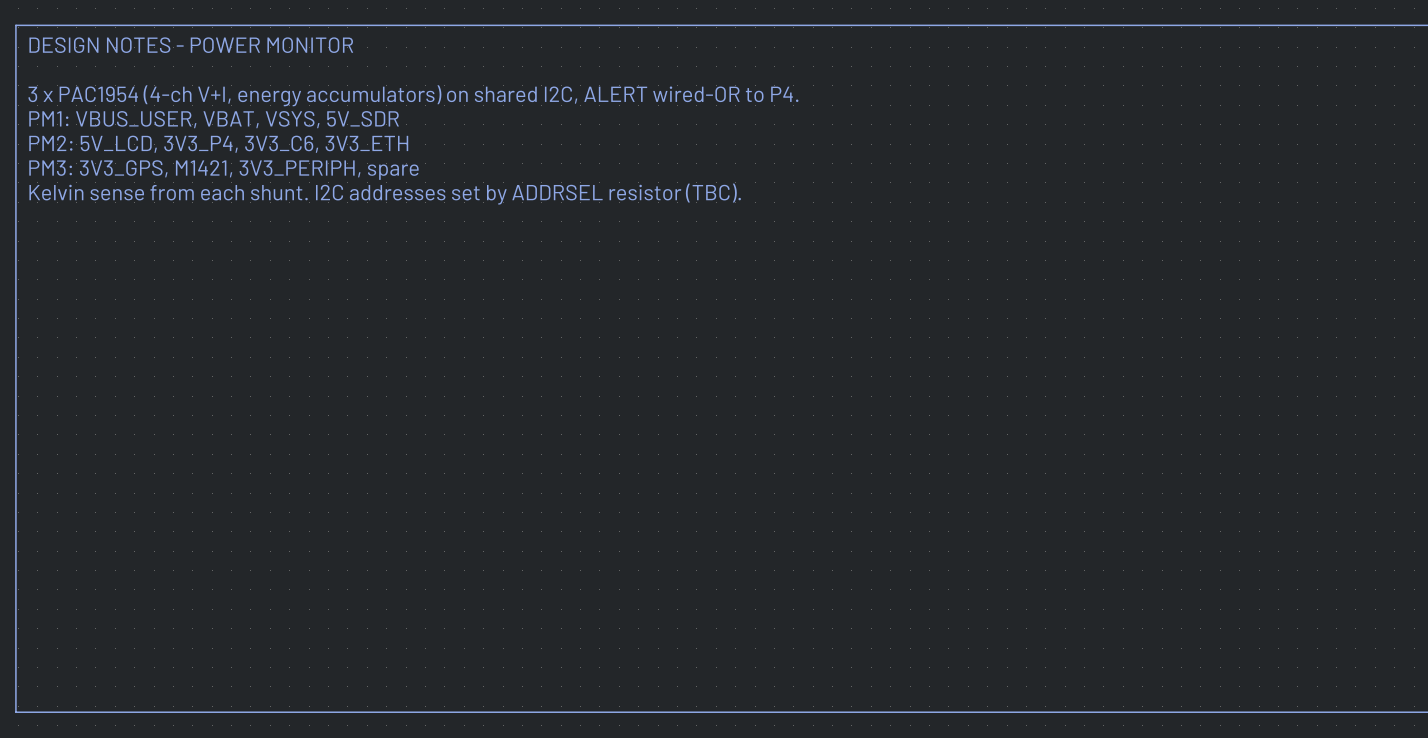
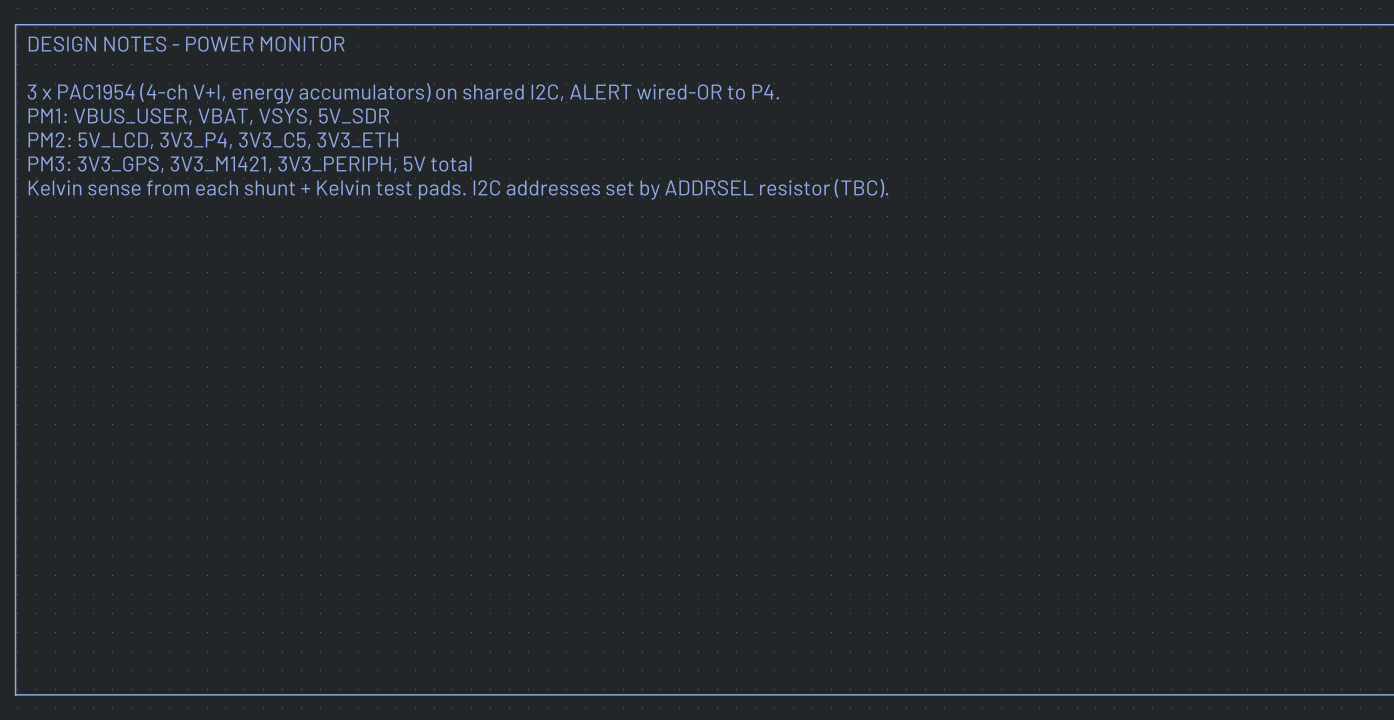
text: PM2: 5V_LCD, 3V3_P4, 3V3_C6, 3V3_ETH (218, 144) -> PM2: 5V_LCD, 3V3_P4, 3V3_C5, 3V3_ETH (213, 140)
text: PM3: 3V3_GPS, M1421, 3V3_PERIPH, spare (223, 170) -> PM3: 3V3_GPS, 3V3_M1421, 3V3_PERIPH, 5V total (250, 164)
text: Kelvin sense from each shunt. I2C addresses set by ADDRSEL resistor (TBC). (385, 194) -> Kelvin sense from each shunt + Kelvin test pads. I2C addresses set by ADDRSEL resistor (TBC). (458, 189)

